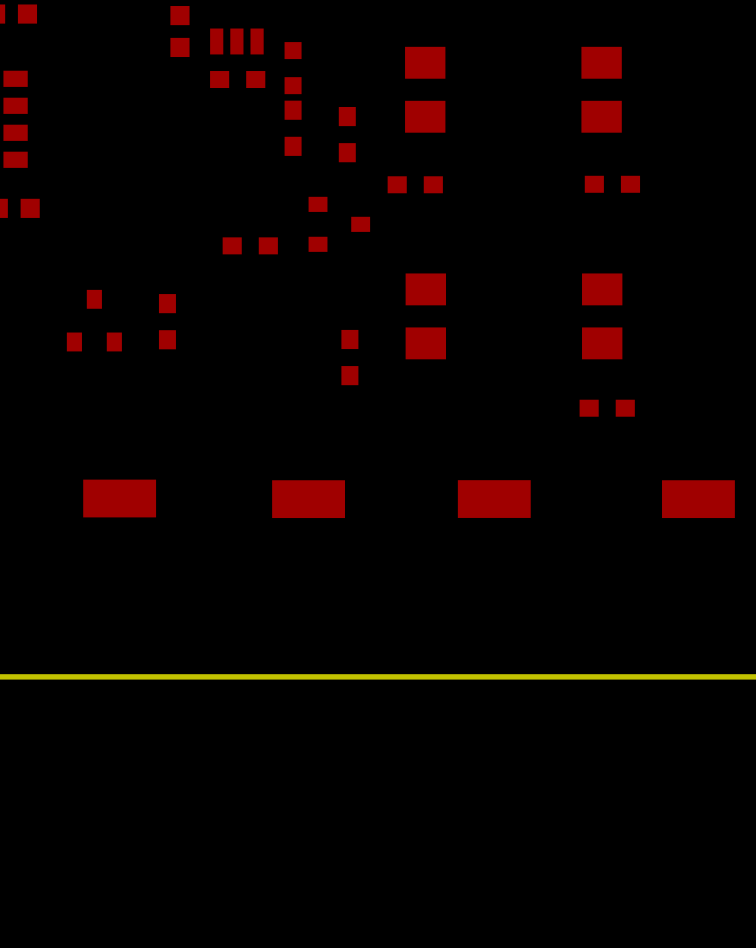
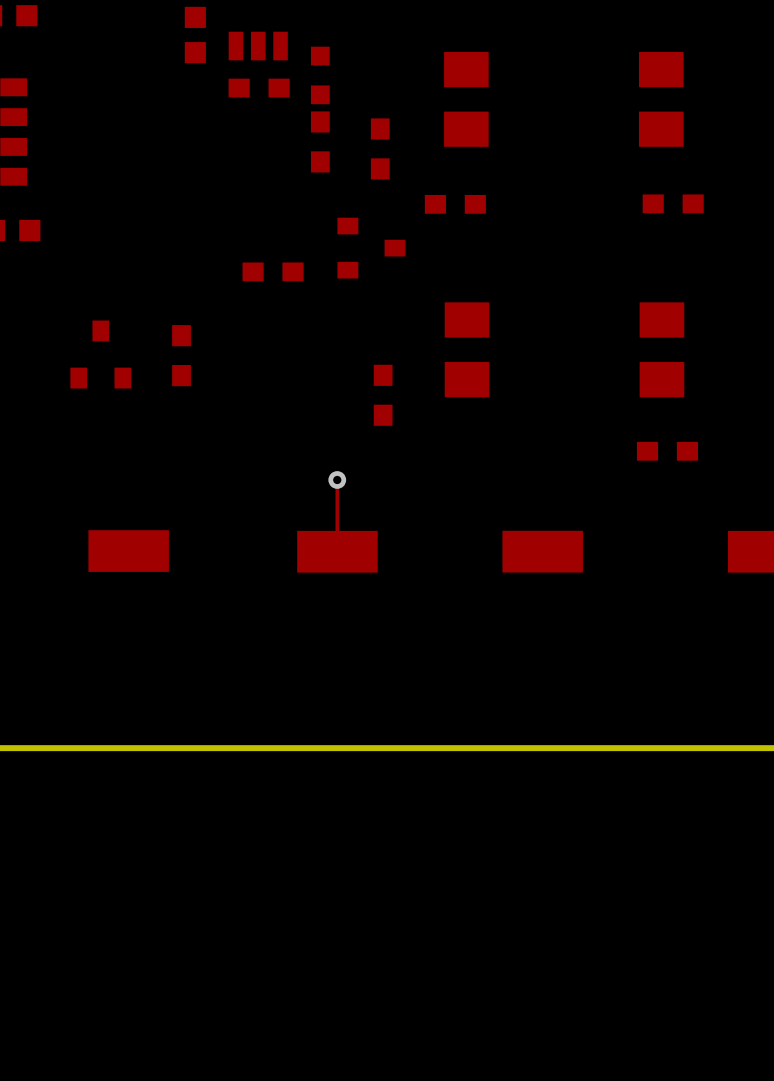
top track: none -> (337, 479) (337, 551)
via: none -> (337, 479)

